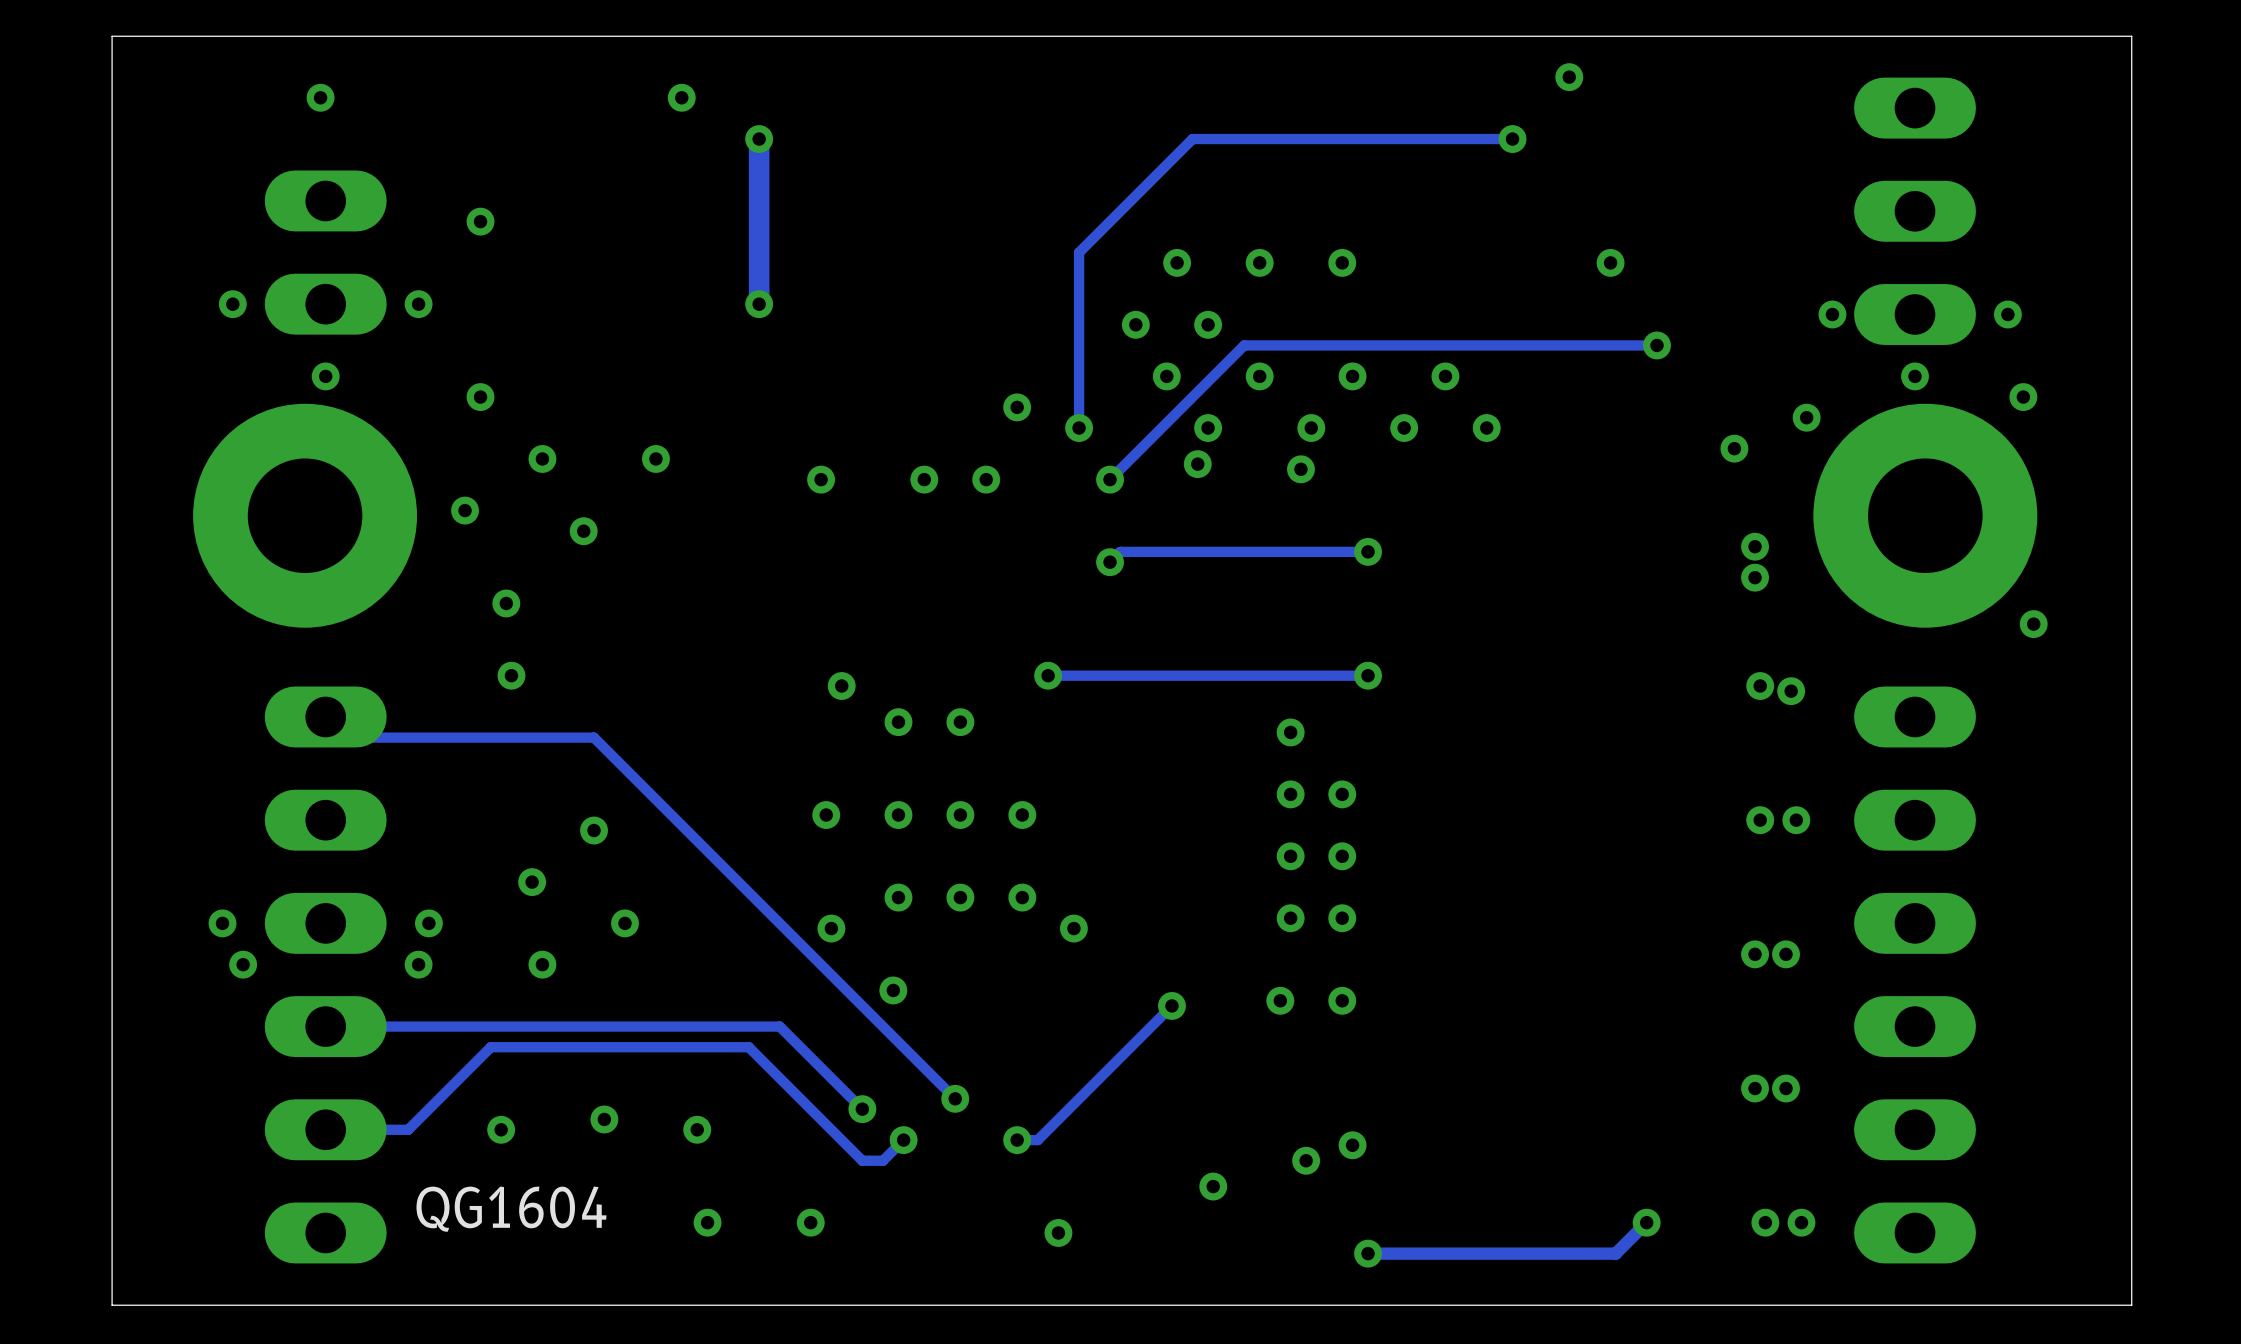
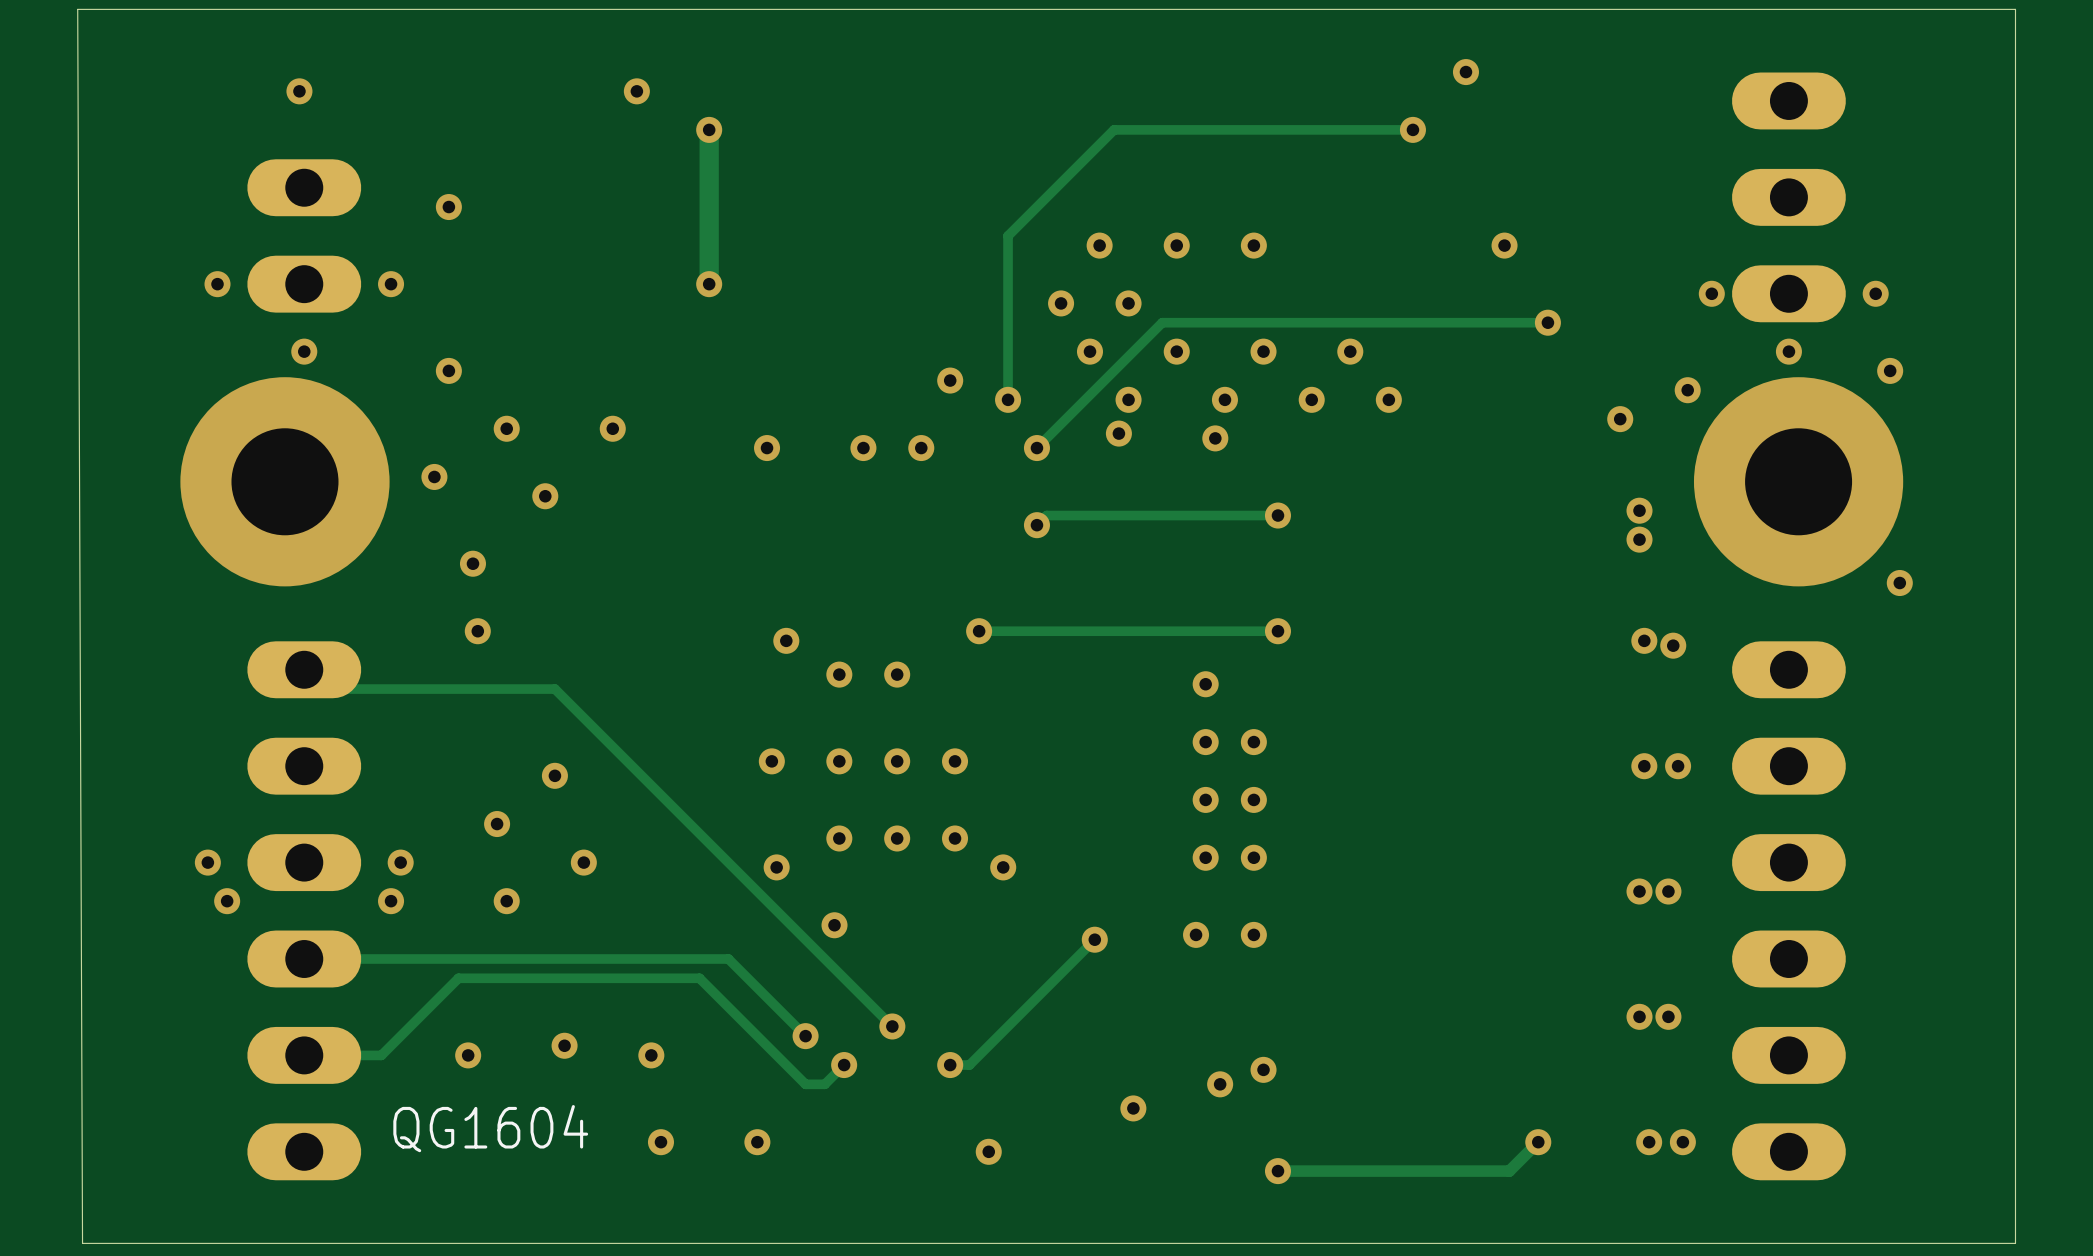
board edge: (2131, 36) (112, 36) (112, 1305) (2131, 1305) (2131, 36) -> (2015, 9) (2015, 1243) (82, 1243) (77, 9) (2015, 9)

